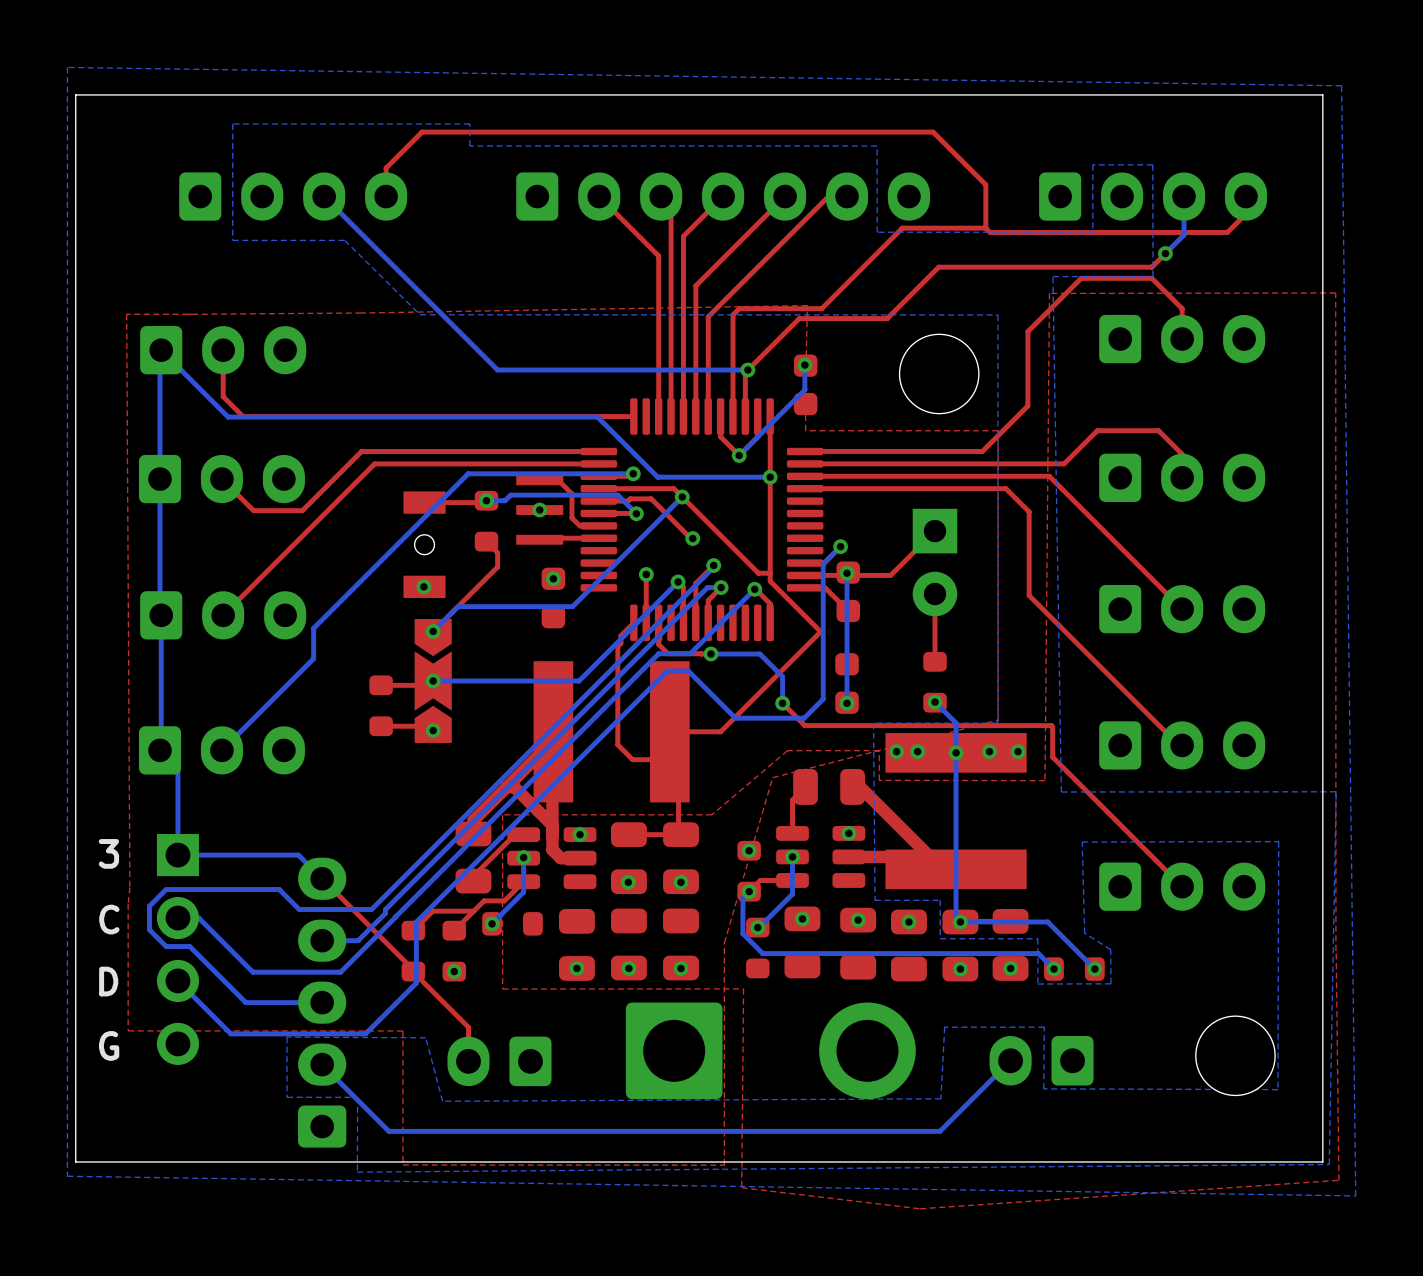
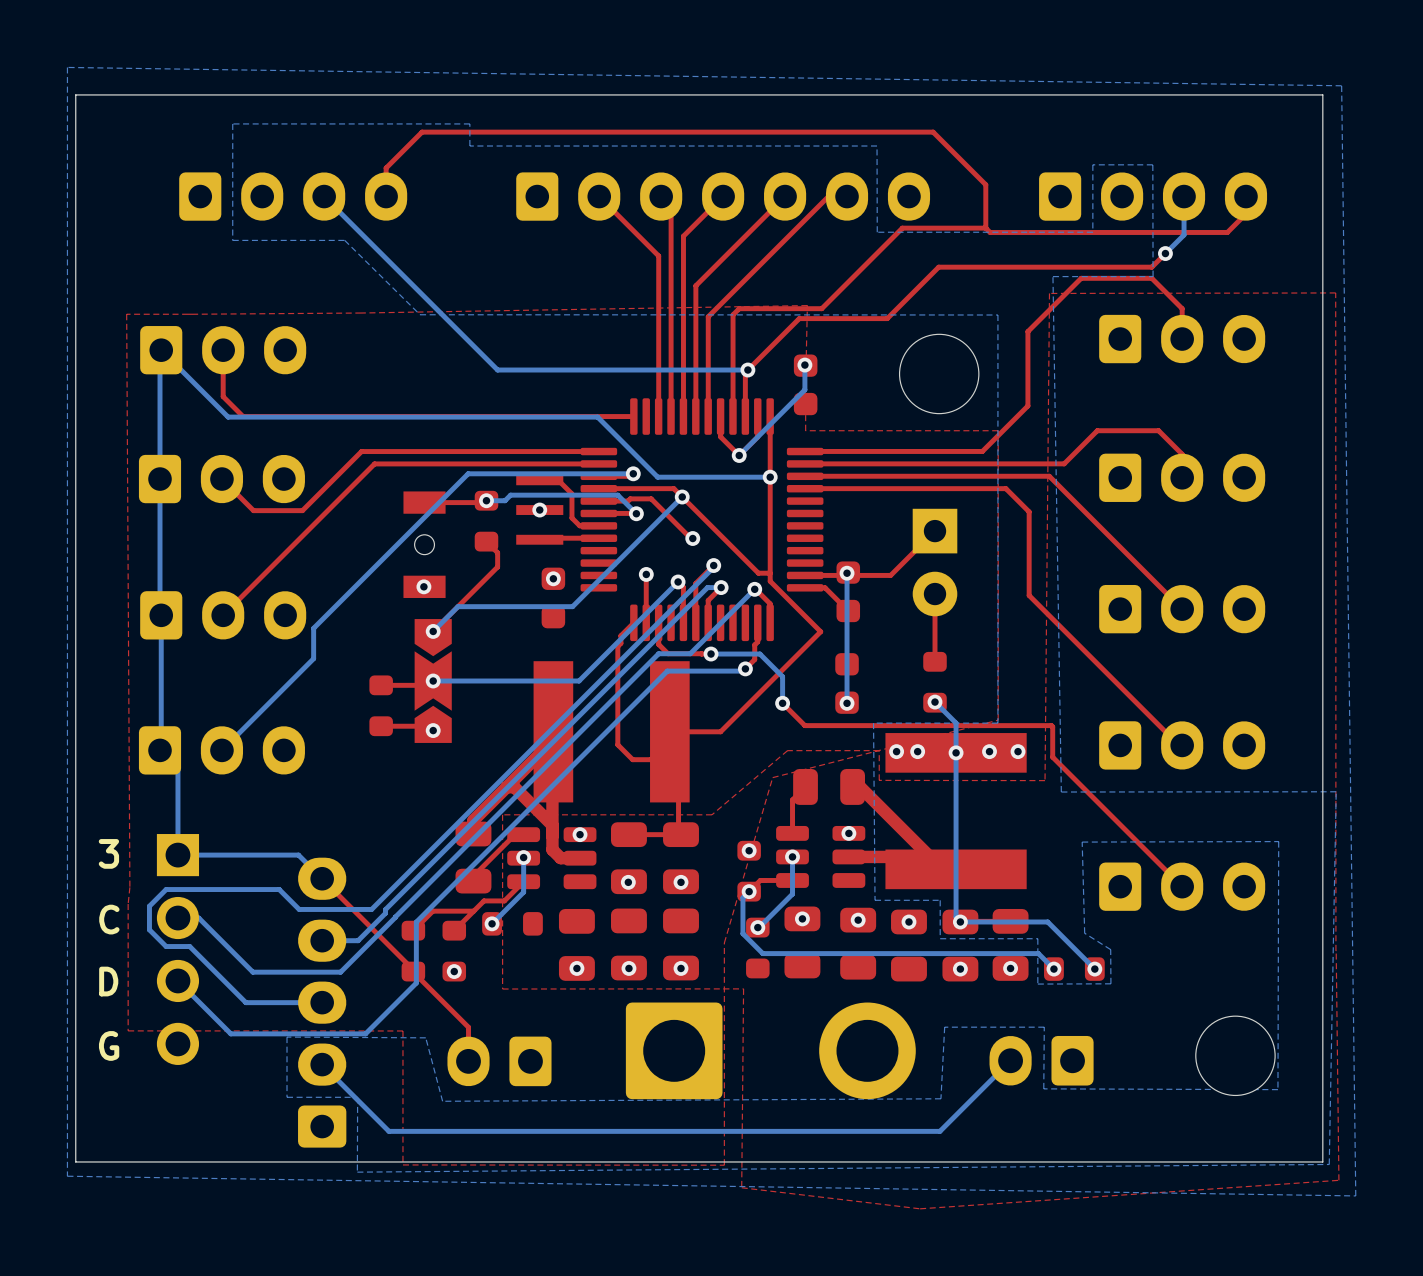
bottom track: (840, 546) (823, 563) (823, 699) (804, 718) (735, 718) (688, 671) -> (745, 668) (743, 671) (688, 671)
via: (840, 546) -> none
top track: none -> (757, 622) (757, 641) (754, 644) (754, 659) (745, 668)
via: none -> (745, 668)

